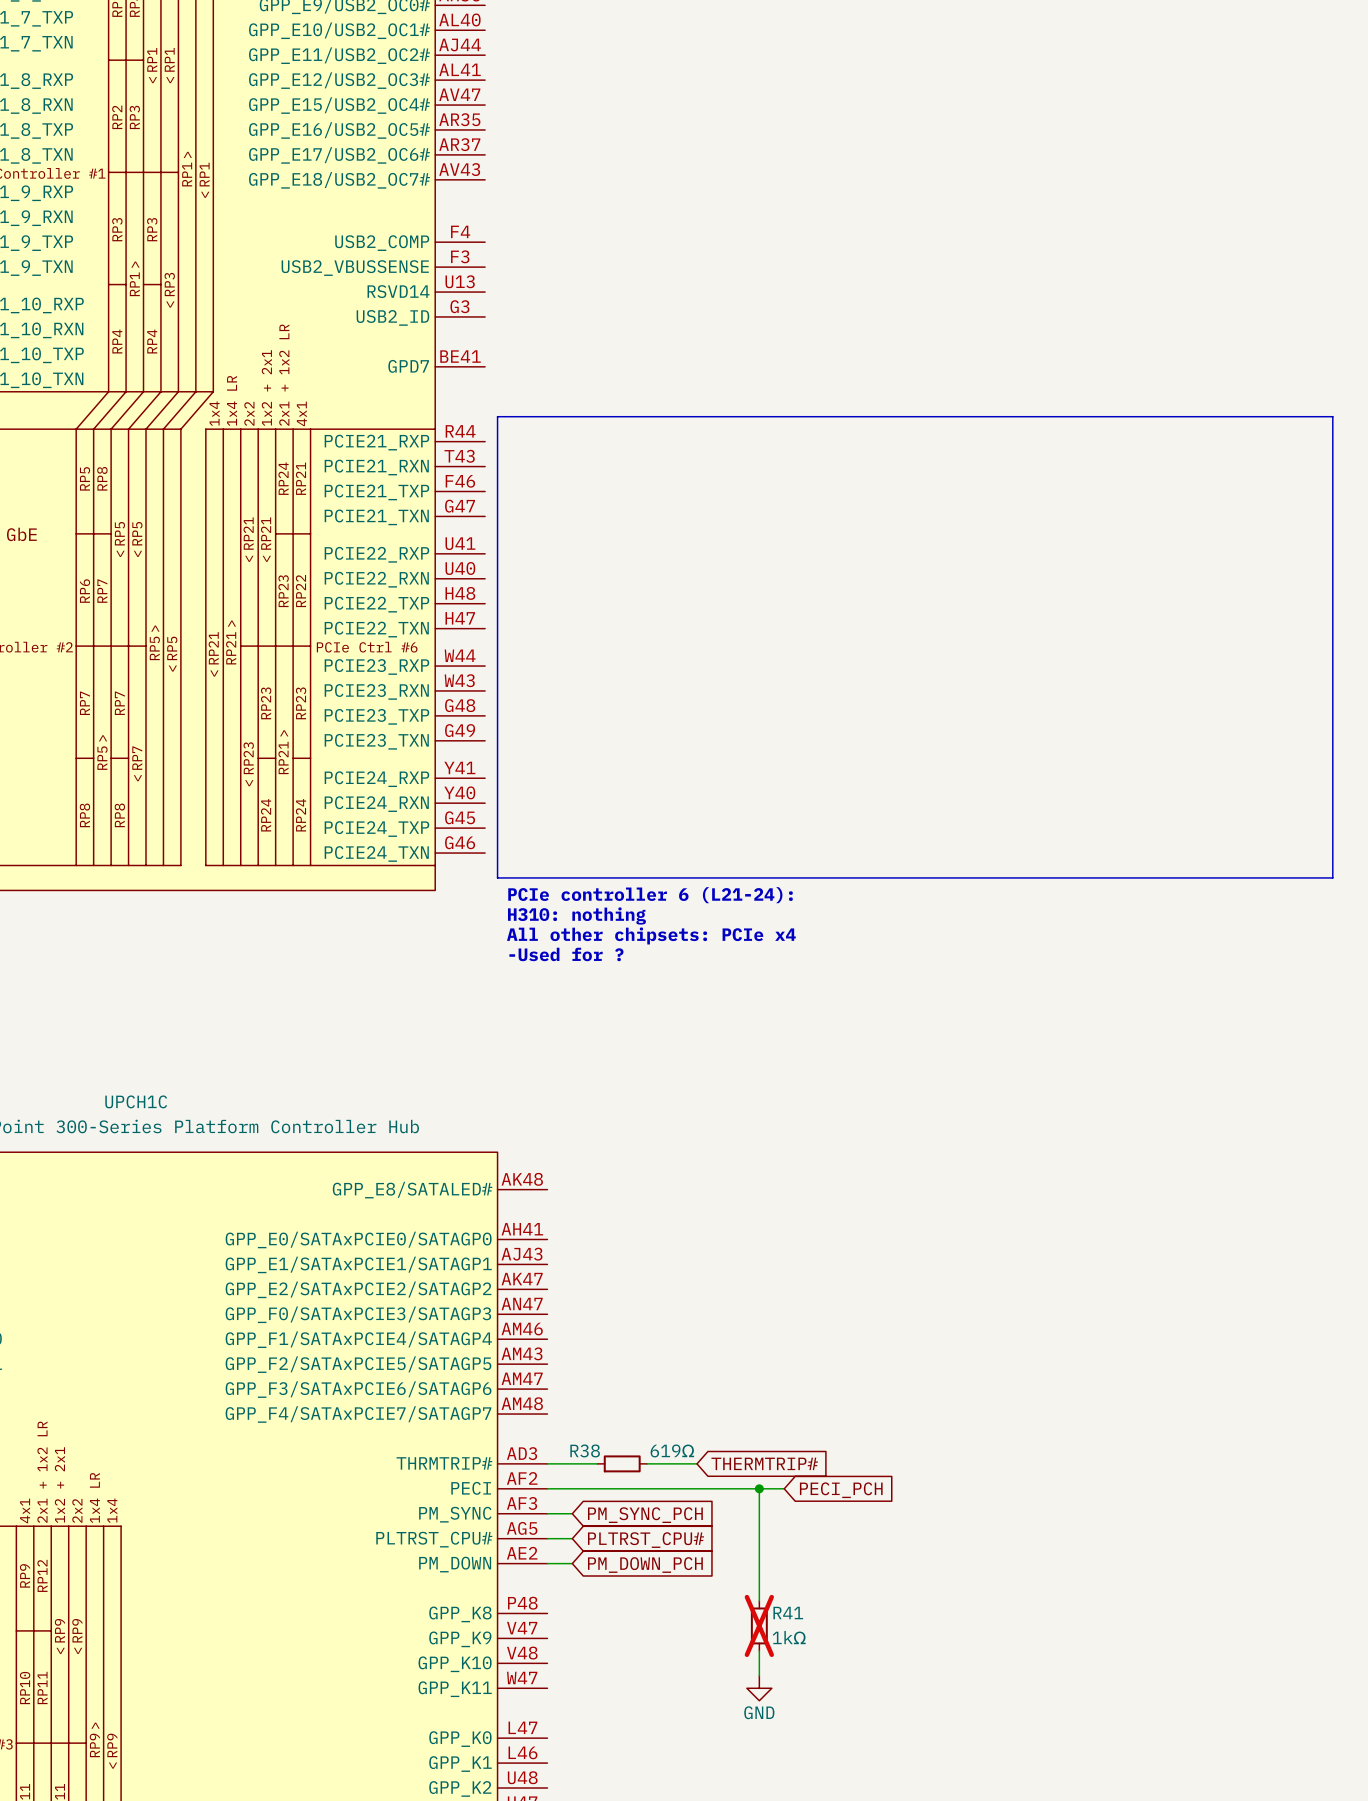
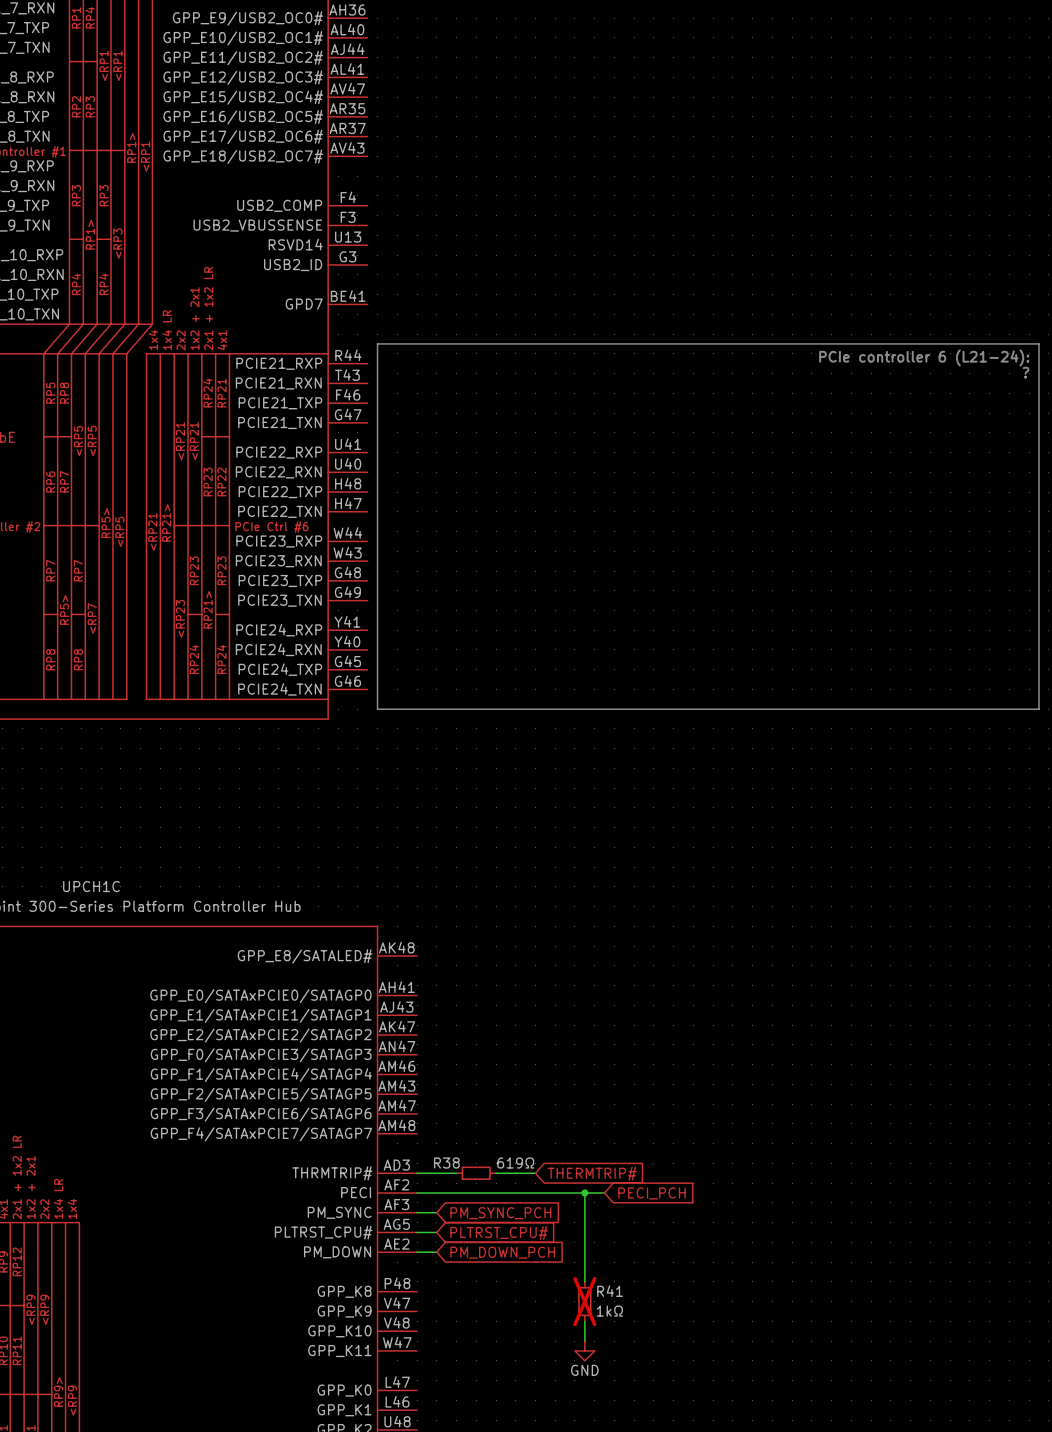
text: none -> PCIe controller 6 (L21-24): (924, 357)
text: none -> ? (1026, 372)
text: PCIe controller 6 (L21-24): (650, 895) -> none
text: H310: nothing (576, 916) -> none
text: All other chipsets: PCIe x4 (651, 935) -> none
text: -Used for ? (566, 954) -> none

